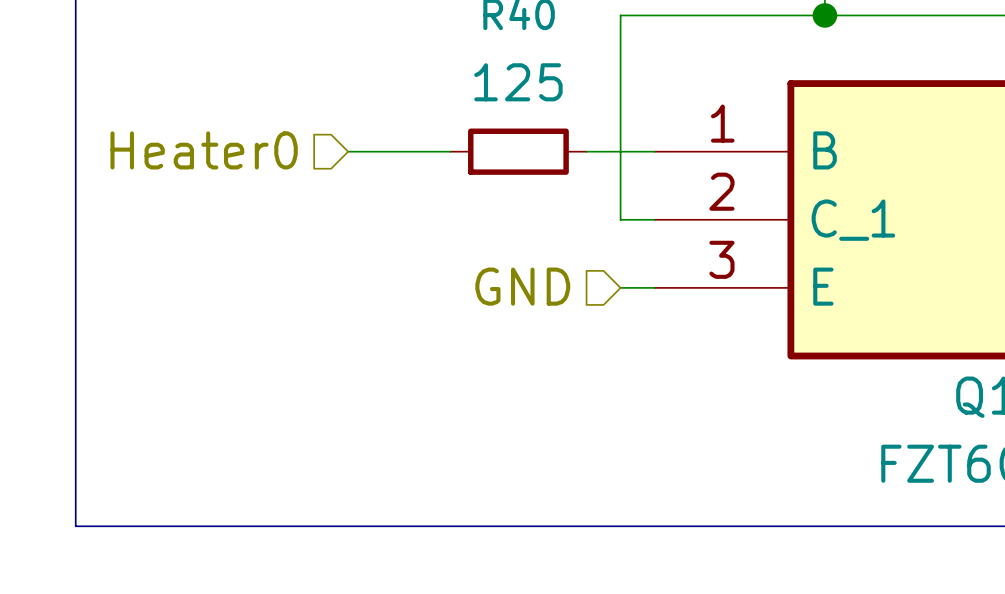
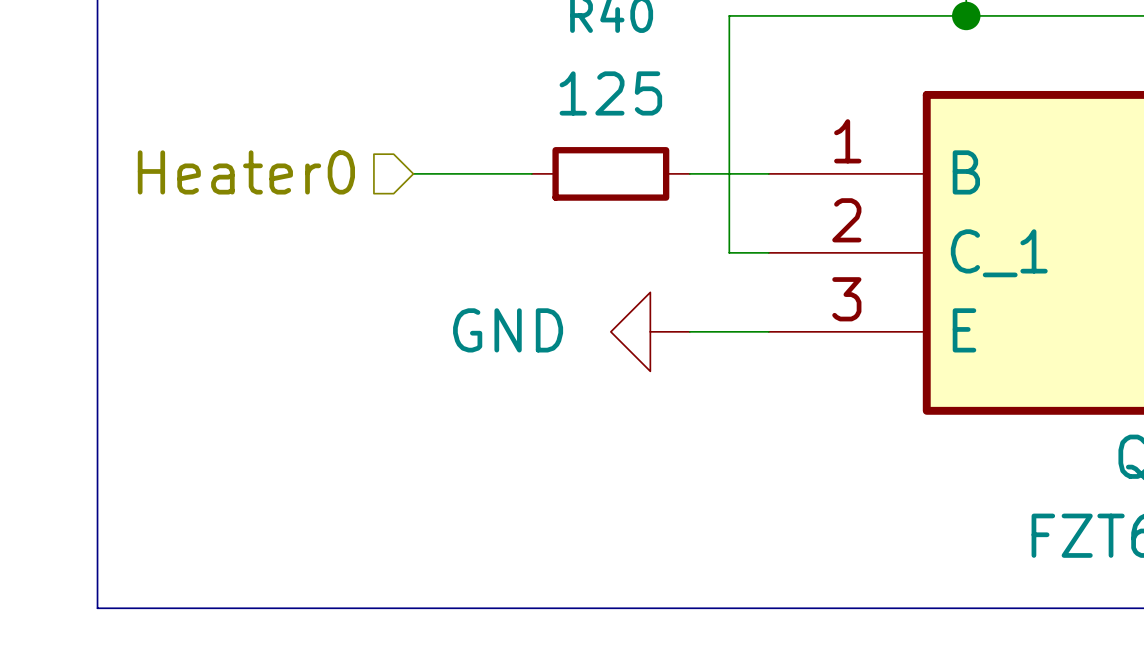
hierarchical label: GND (522, 286) -> none
power symbol: none -> GND (650, 331)
wire: none -> (689, 331) (729, 331)

